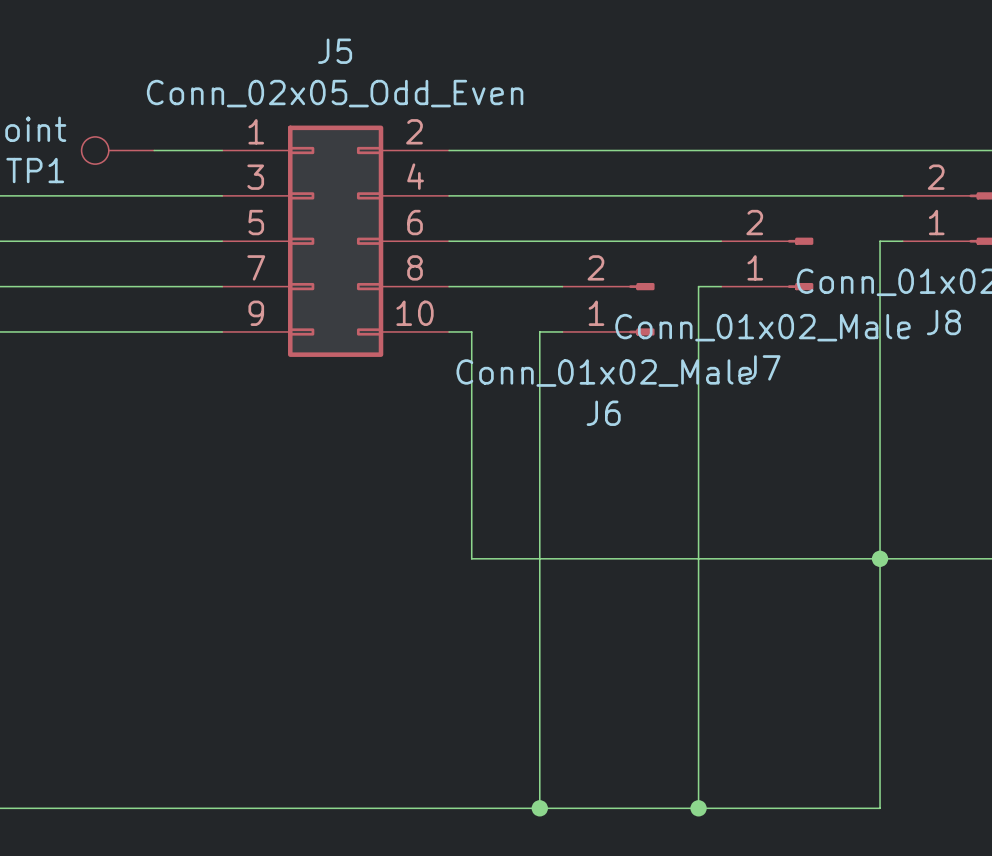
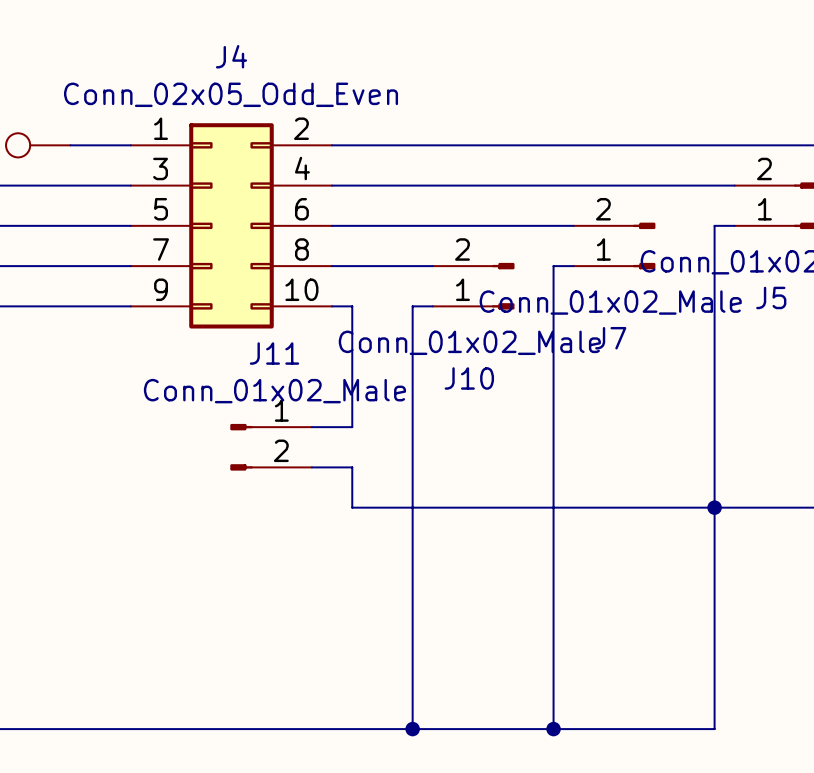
J5 name: J5 (335, 51) -> J4 (231, 56)
J8 name: J8 (943, 322) -> J5 (771, 297)
J6 name: J6 (603, 413) -> J10 (469, 378)
wire: (471, 468) (471, 513) -> (352, 427) (312, 427)
J11: none -> Conn_01x02_Male (271, 447)
wire: none -> (312, 467) (352, 467)

